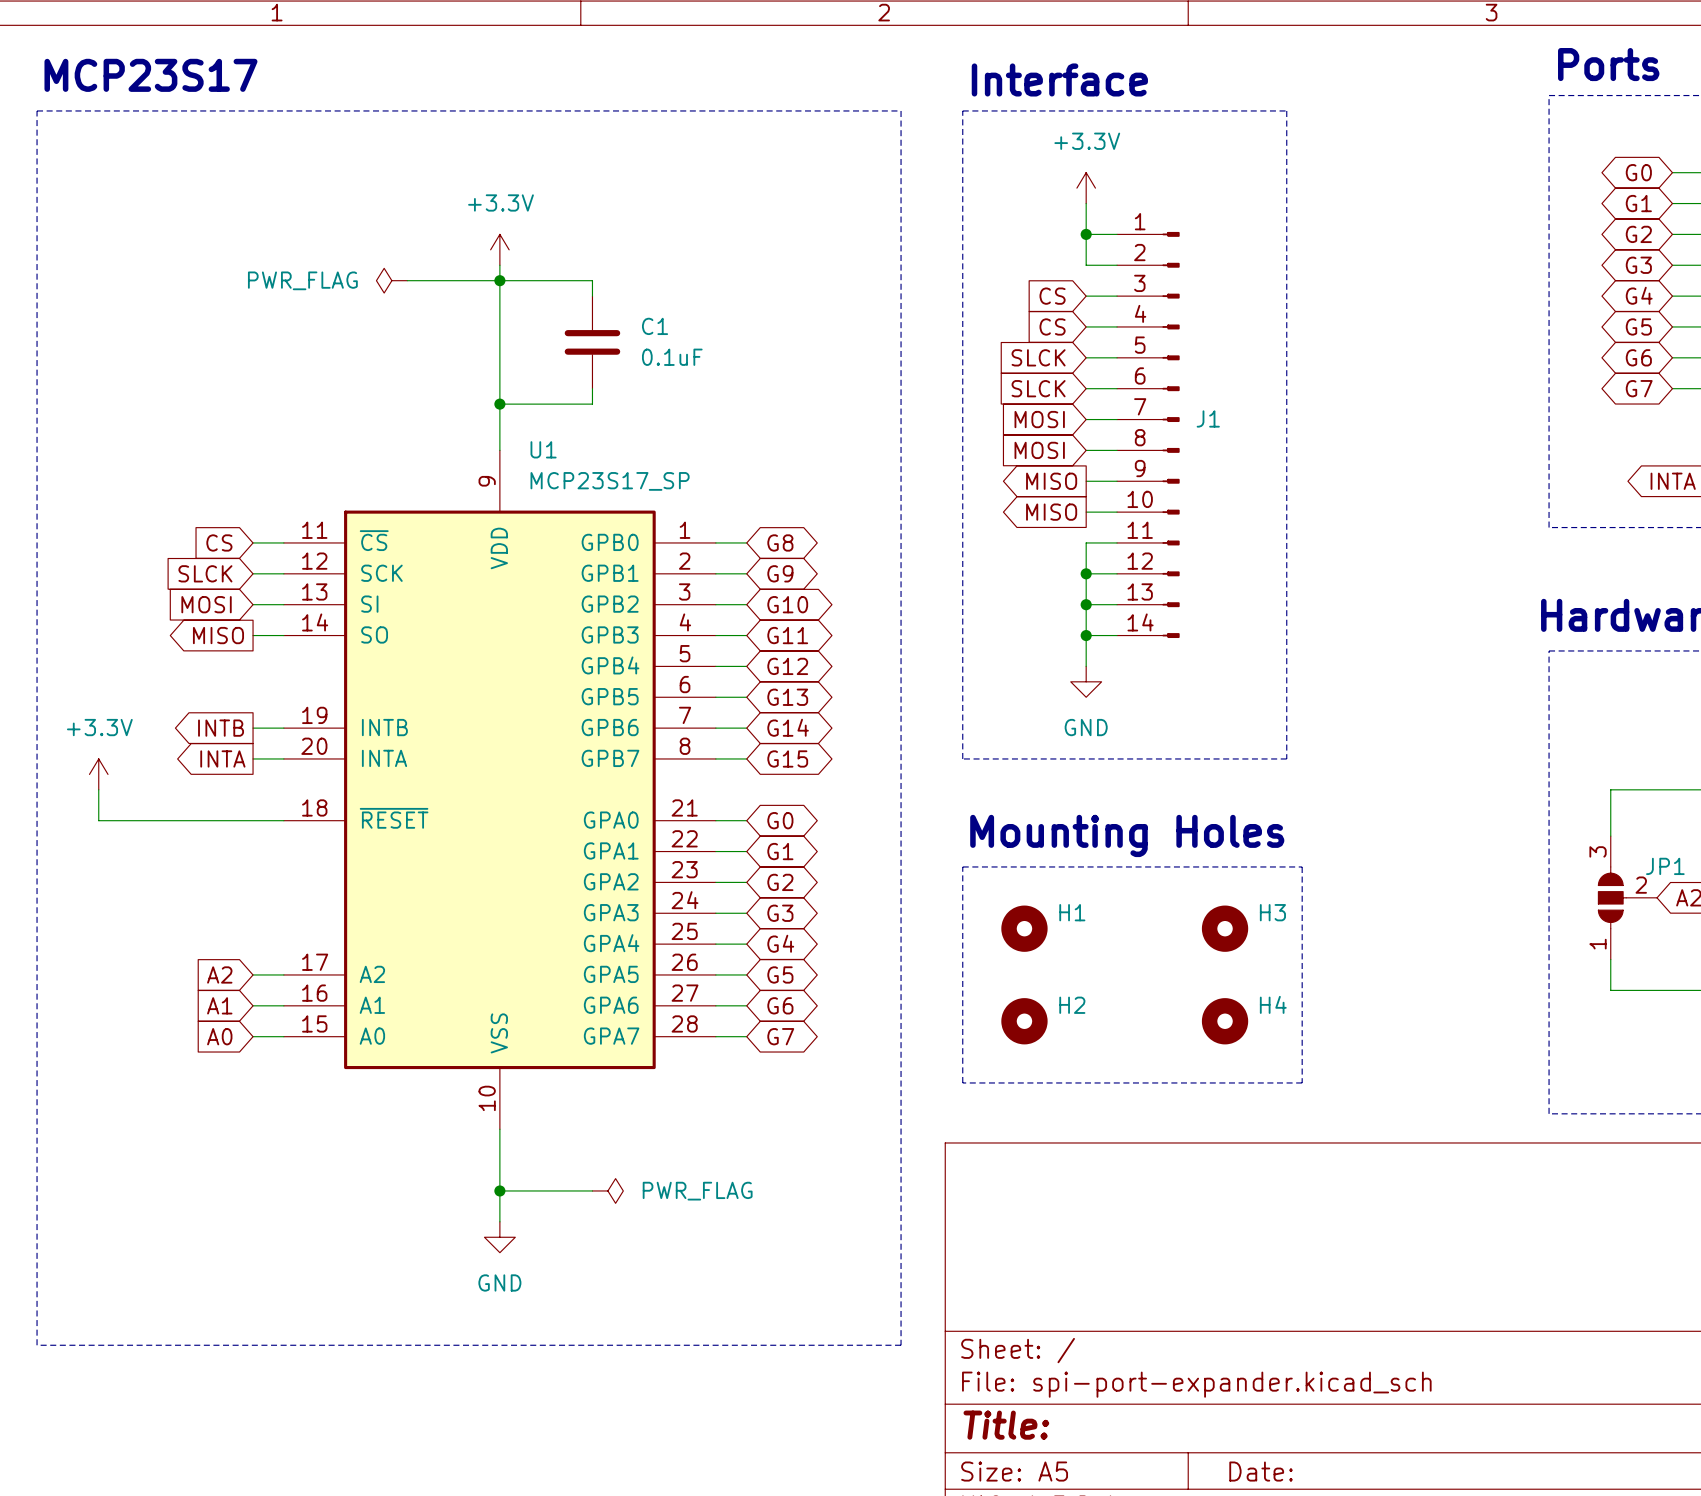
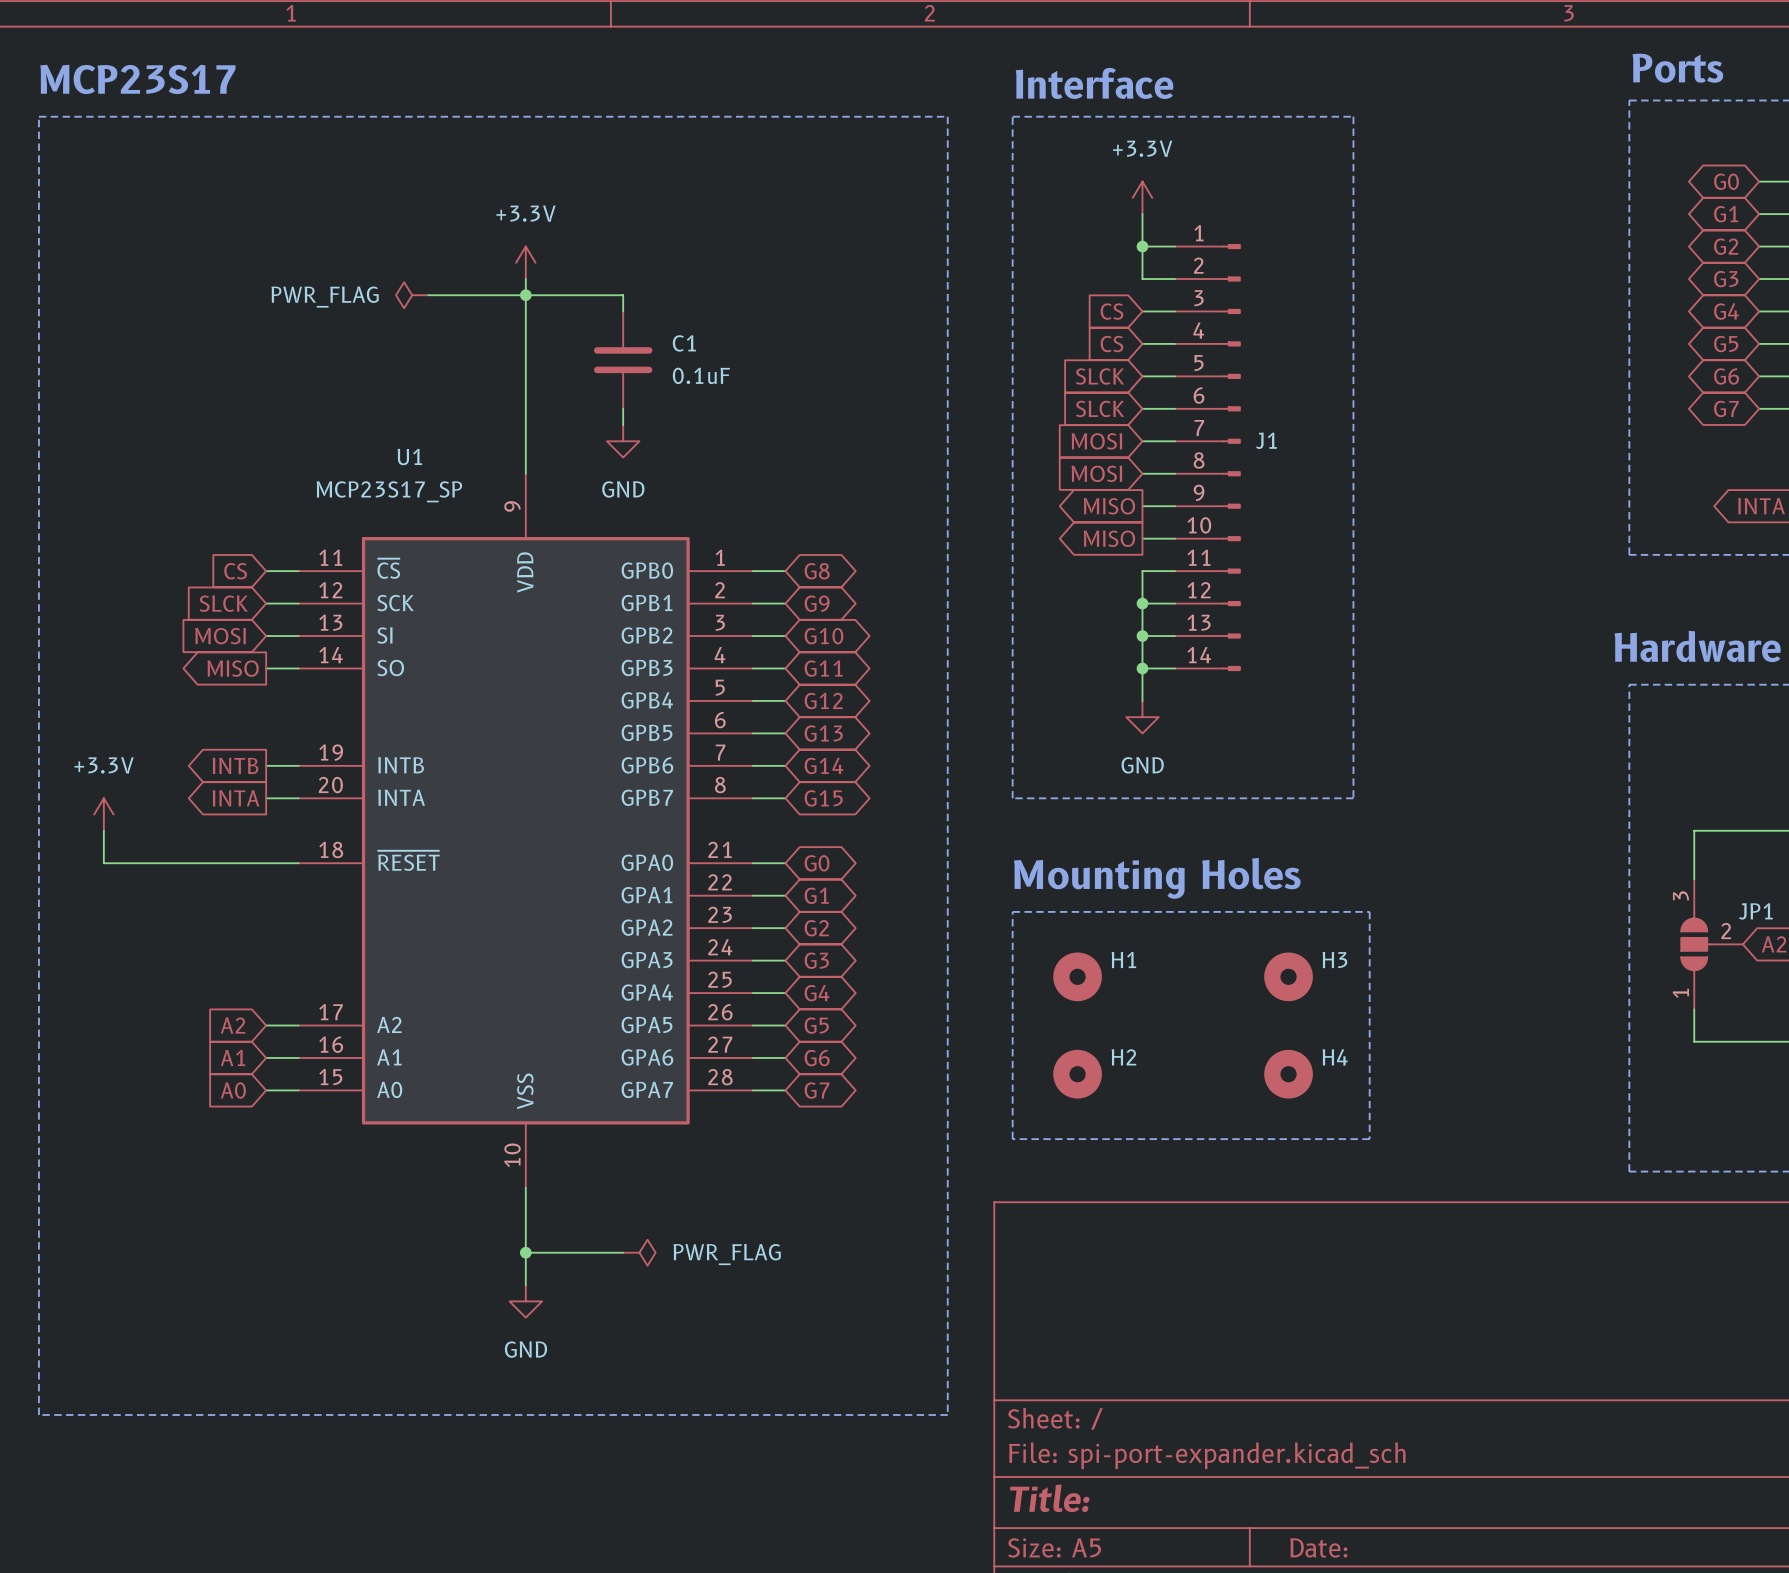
wire: (499, 404) (592, 404) -> none
junction: (499, 404) -> none
power symbol: none -> GND (623, 441)
U1 name position: U1 (543, 449) -> U1 (409, 457)
U1 value position: MCP23S17_SP (610, 481) -> MCP23S17_SP (389, 491)

